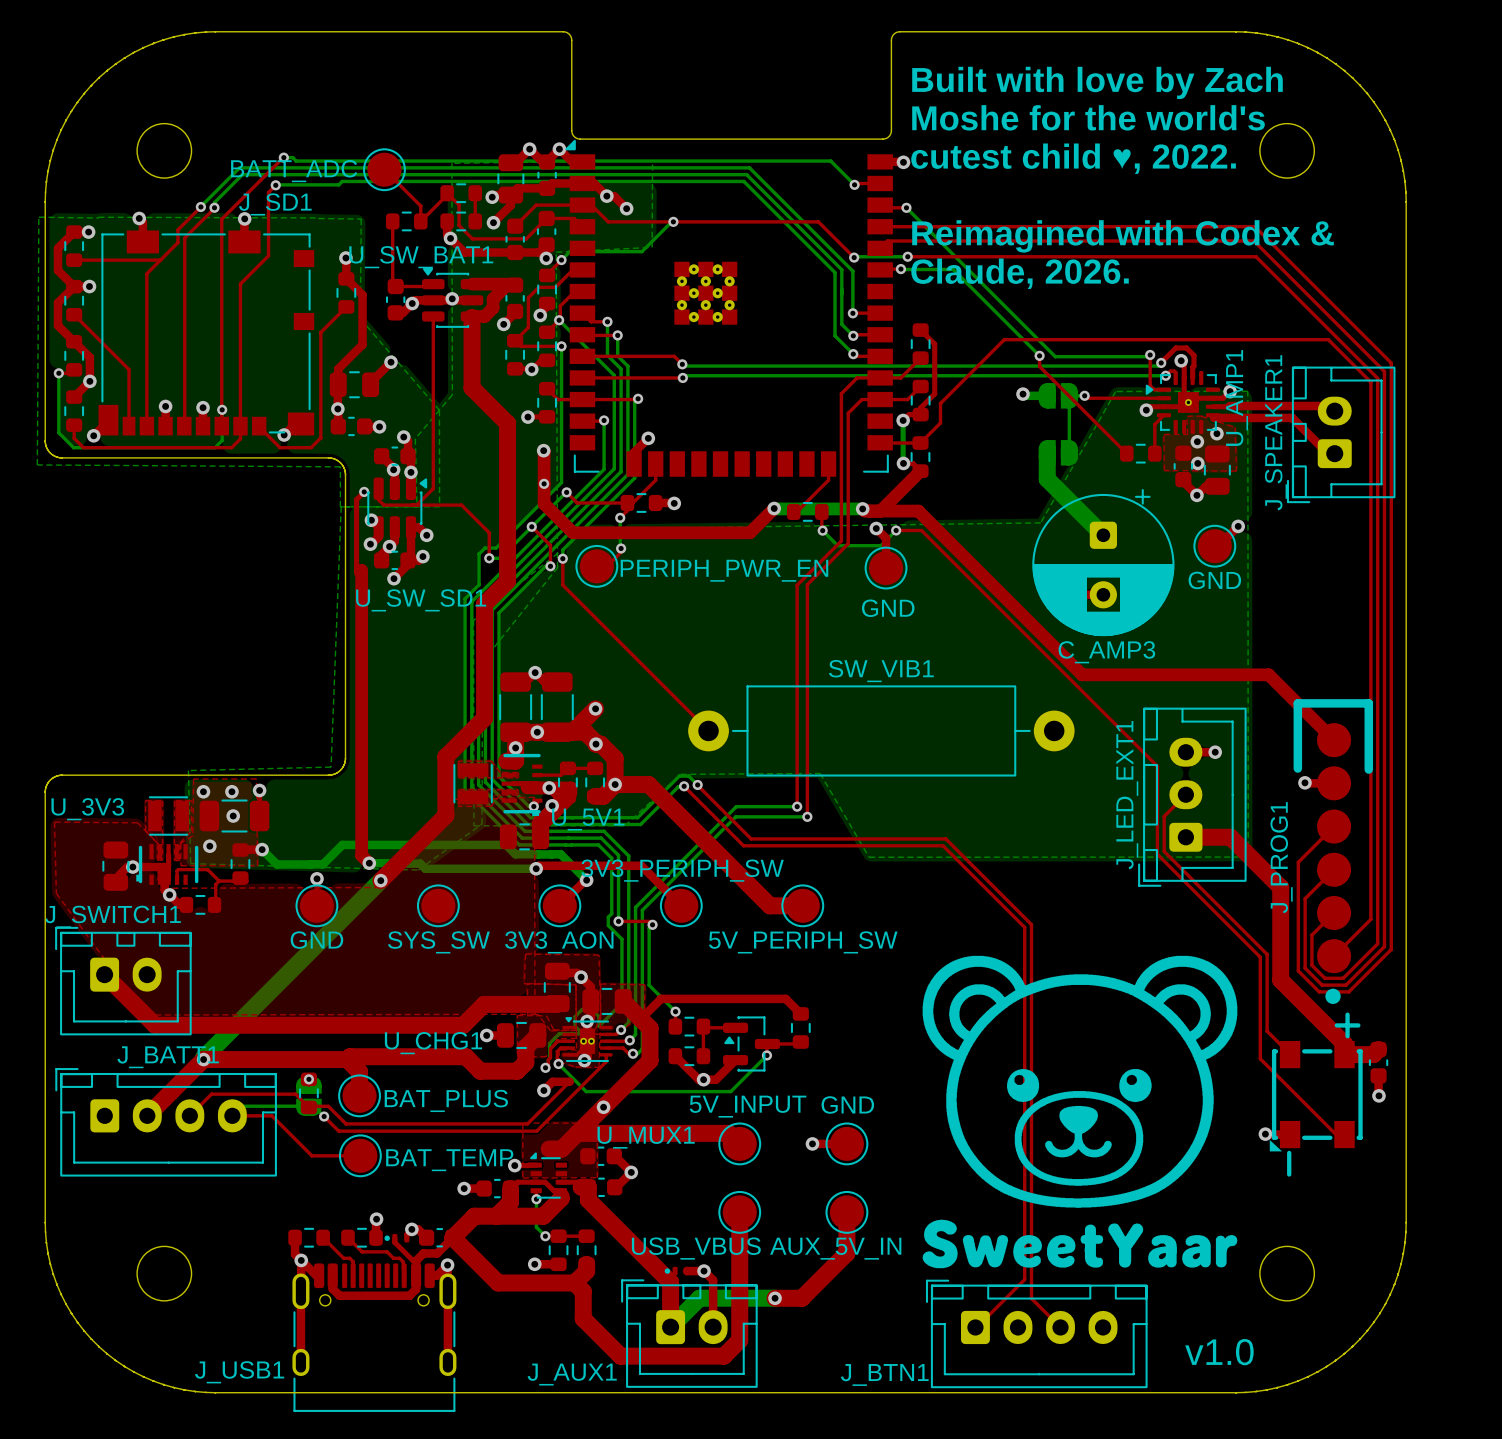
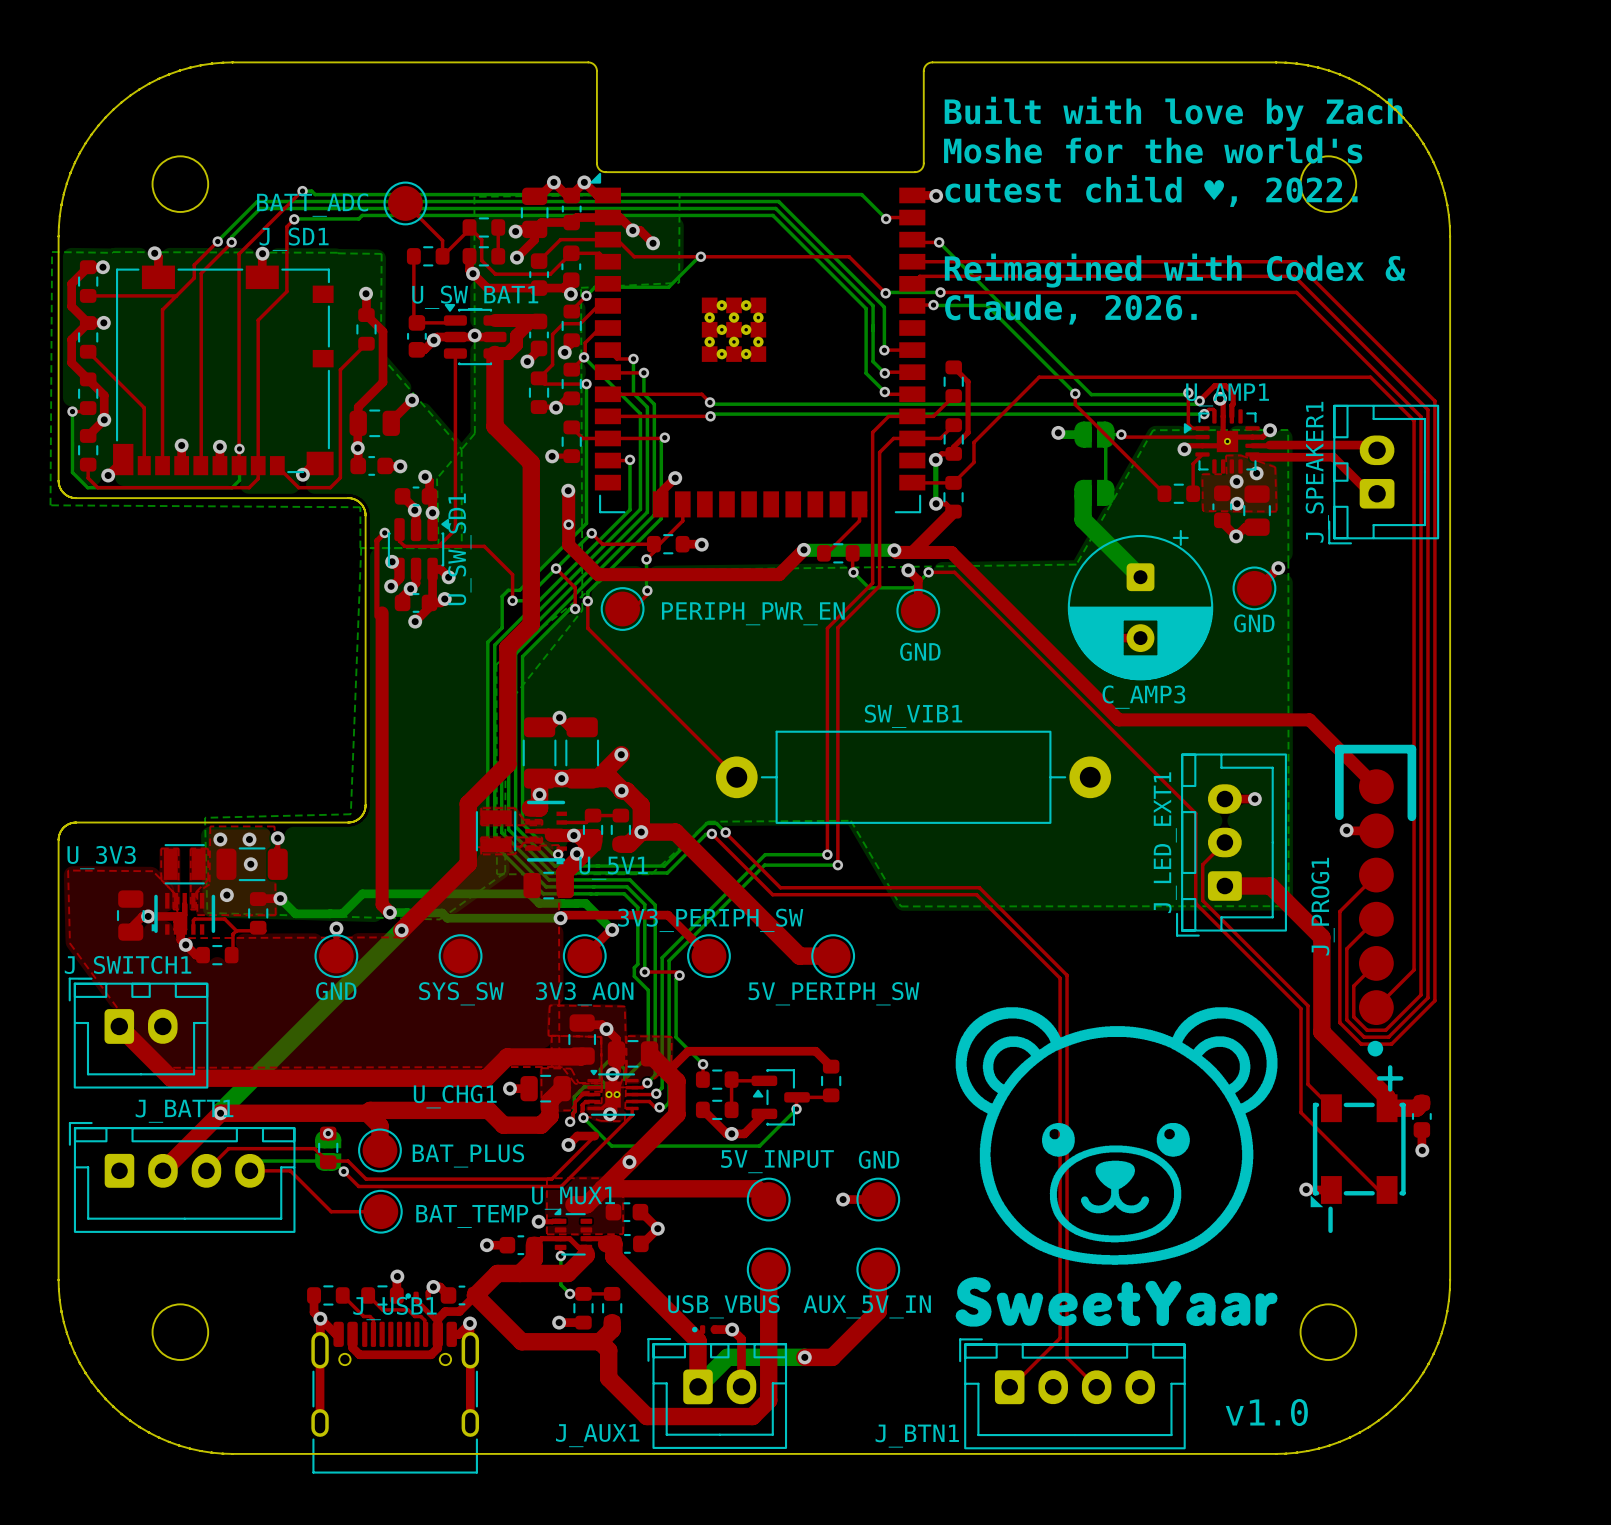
U_SW_BAT1 name position: U_SW_BAT1 (421, 257) -> U_SW_BAT1 (475, 297)
U_AMP1 name rotation: 0° (1237, 398) -> 90° clockwise (1227, 394)
U_SW_SD1 name rotation: 0° (421, 600) -> 90° counterclockwise (459, 549)
U_MUX1 name position: U_MUX1 (646, 1137) -> U_MUX1 (573, 1198)
J_USB1 name position: J_USB1 (239, 1372) -> J_USB1 (395, 1308)

